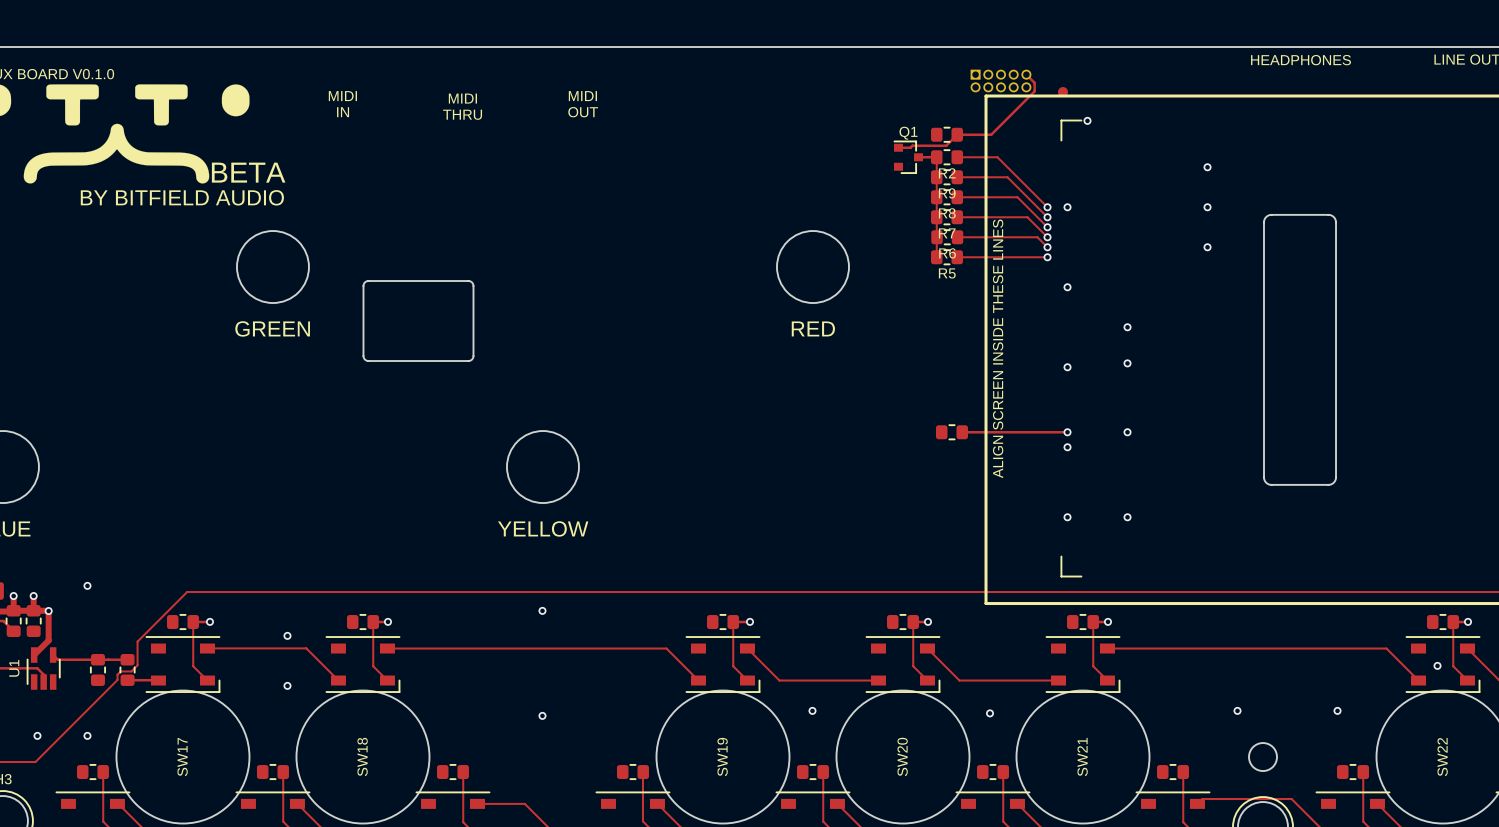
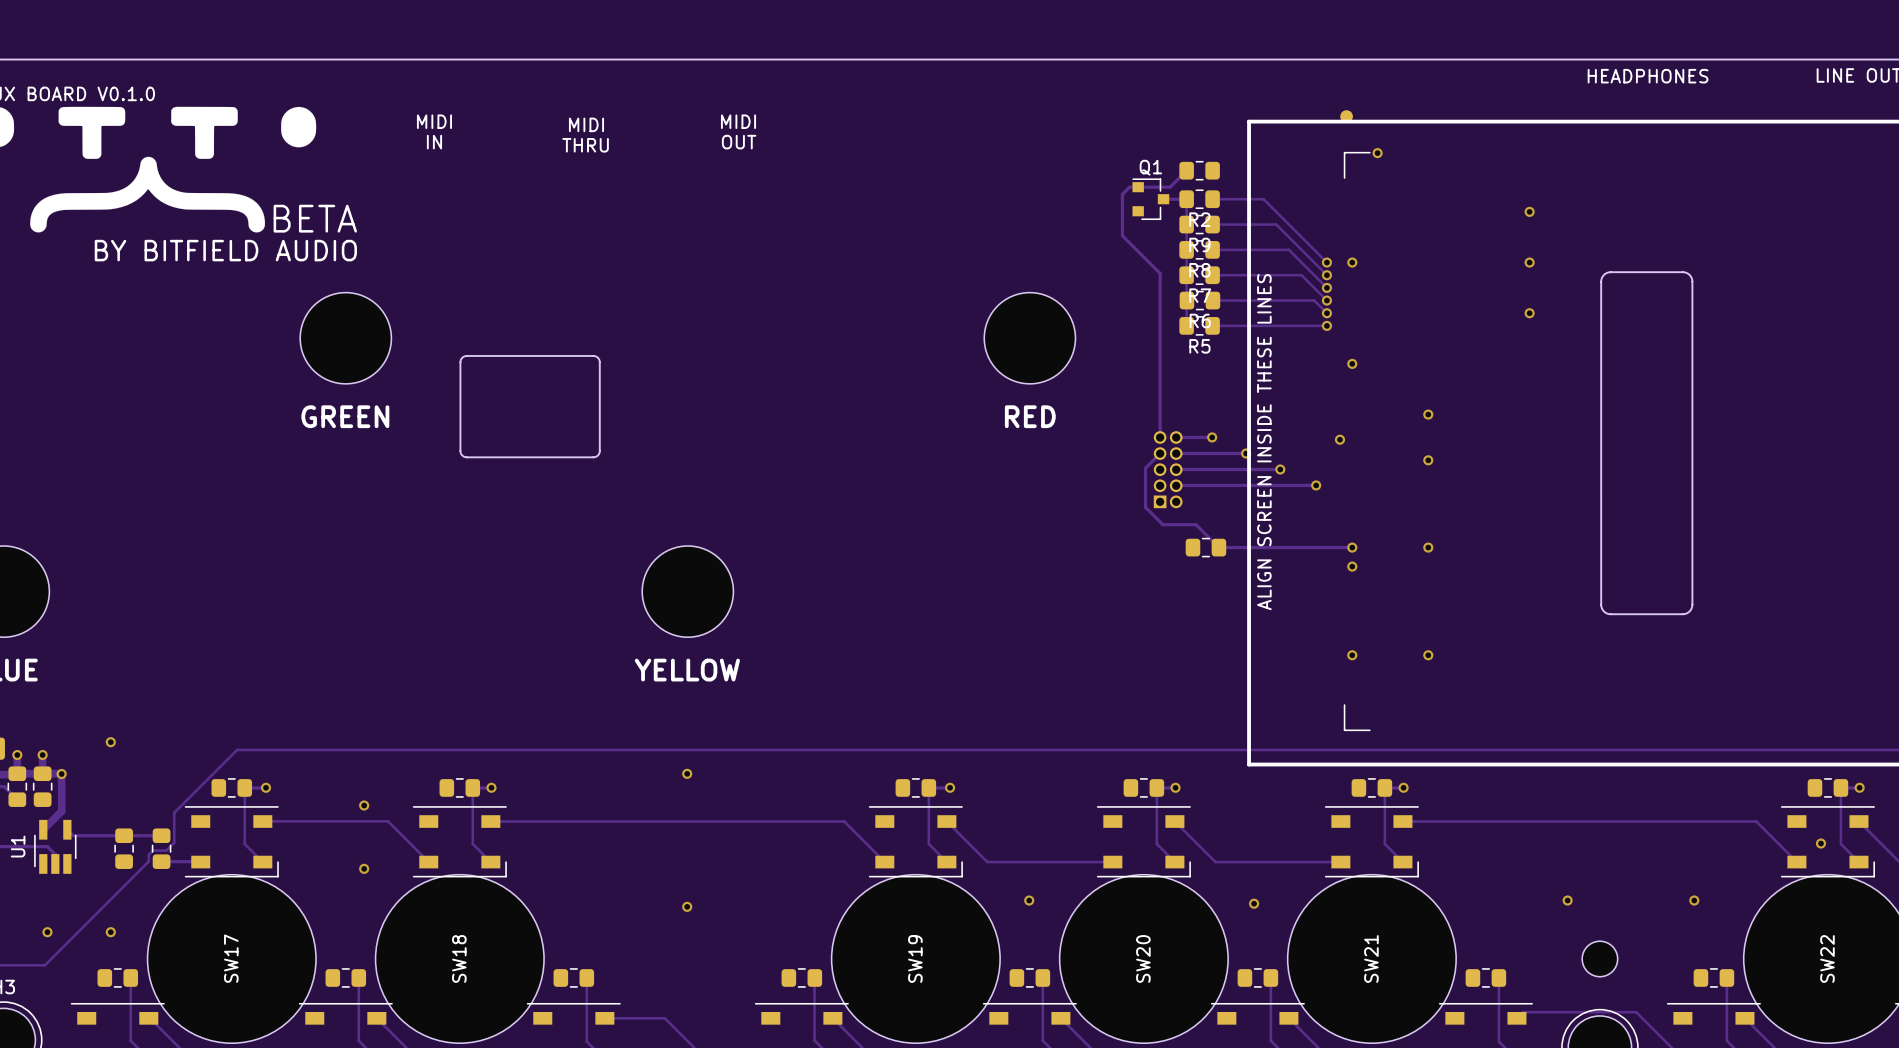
track: (1026, 74) (1034, 82) (1034, 91) (991, 134) (957, 134) (946, 145) (912, 145) (910, 147) -> (1186, 170) (1170, 187) (1153, 187)
part: (1000, 81) -> none
track: none -> (1138, 187) (1129, 187) (1122, 194) (1122, 235) (1160, 273) (1160, 437)
track: none -> (1176, 437) (1212, 437)
via: none -> (1212, 437)
via: none -> (1339, 439)
track: none -> (1160, 453) (1145, 468) (1145, 507) (1162, 524) (1196, 524) (1218, 547)
track: none -> (1176, 453) (1246, 453)
via: none -> (1246, 453)
via: (1067, 367) -> none
part: none -> (1168, 469)
track: none -> (1280, 469) (1176, 469)
via: none -> (1280, 469)
track: none -> (1316, 485) (1176, 485)
via: none -> (1316, 485)

